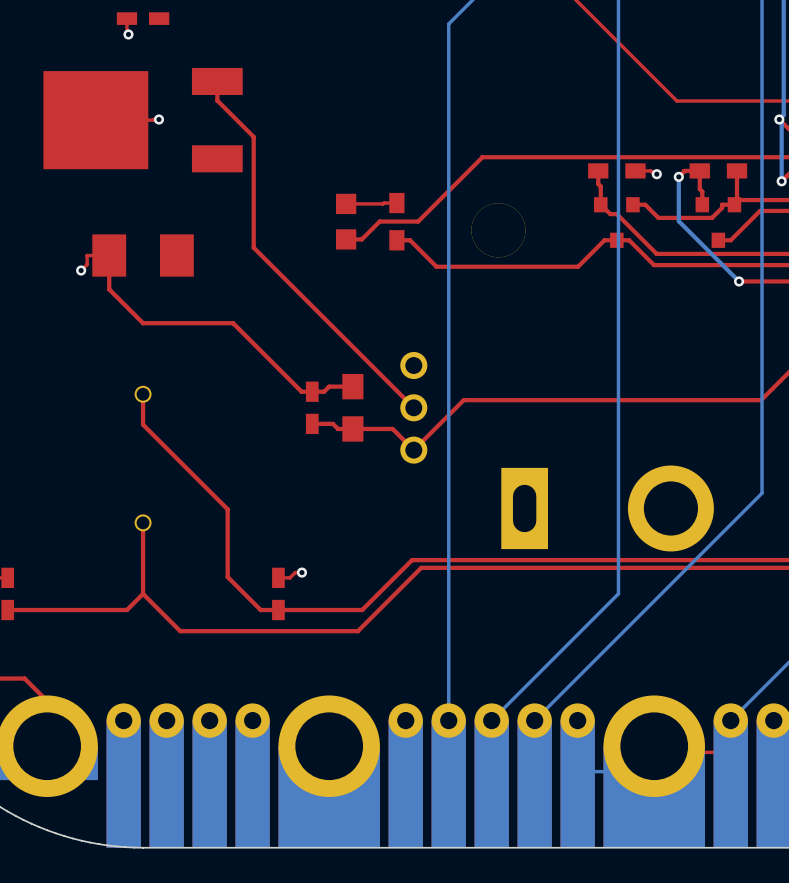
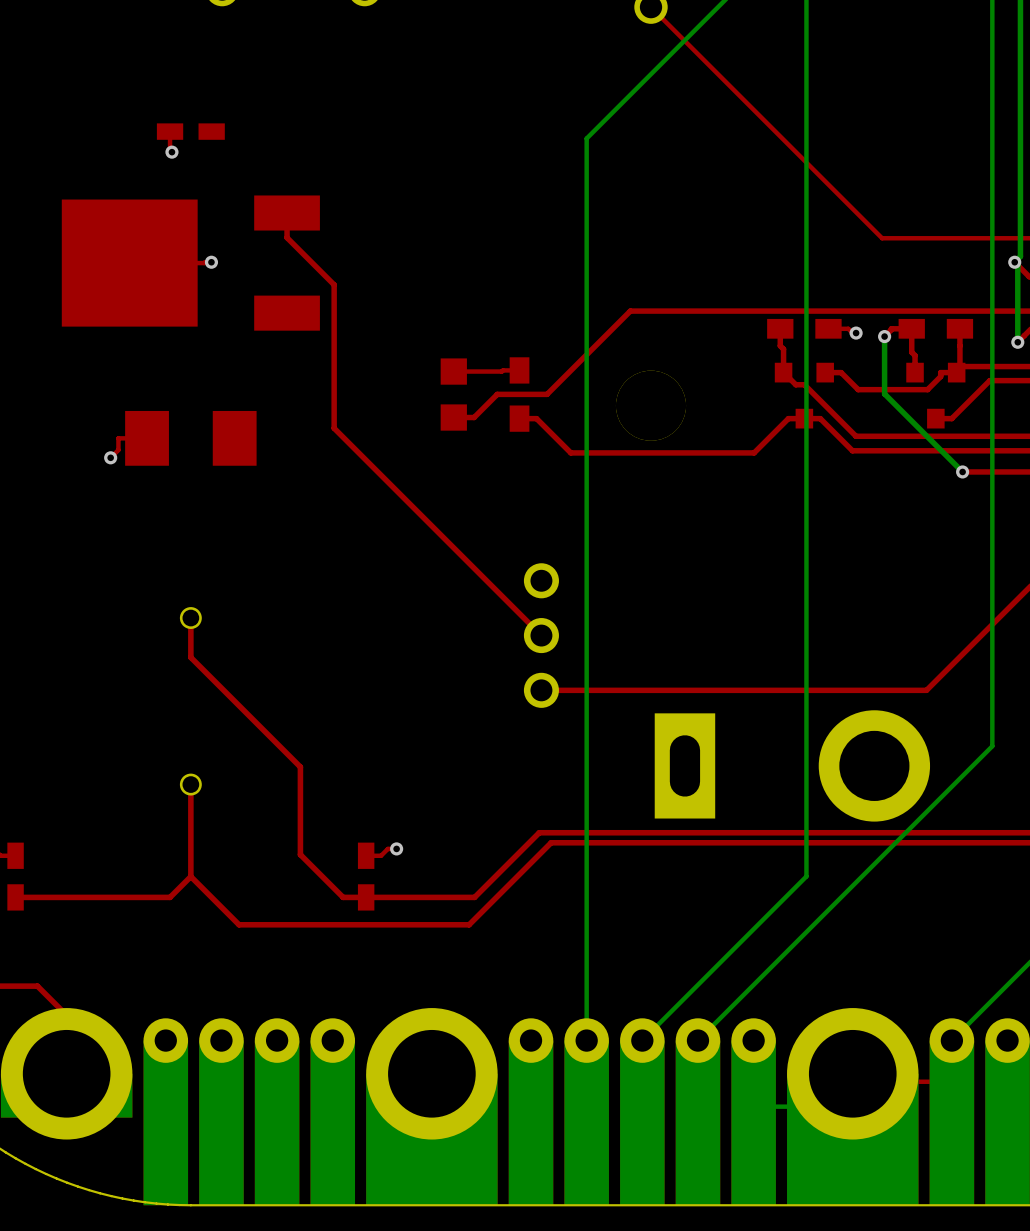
top track: (109, 255) (109, 289) (143, 323) (233, 323) (301, 391) (324, 391) (329, 386) (352, 386) -> none
top track: (761, 400) (463, 400) (413, 450) (392, 428) (338, 428) (332, 423) (312, 423) -> (991, 625) (926, 690) (541, 690)
part: (312, 407) -> none
part: (352, 407) -> none

